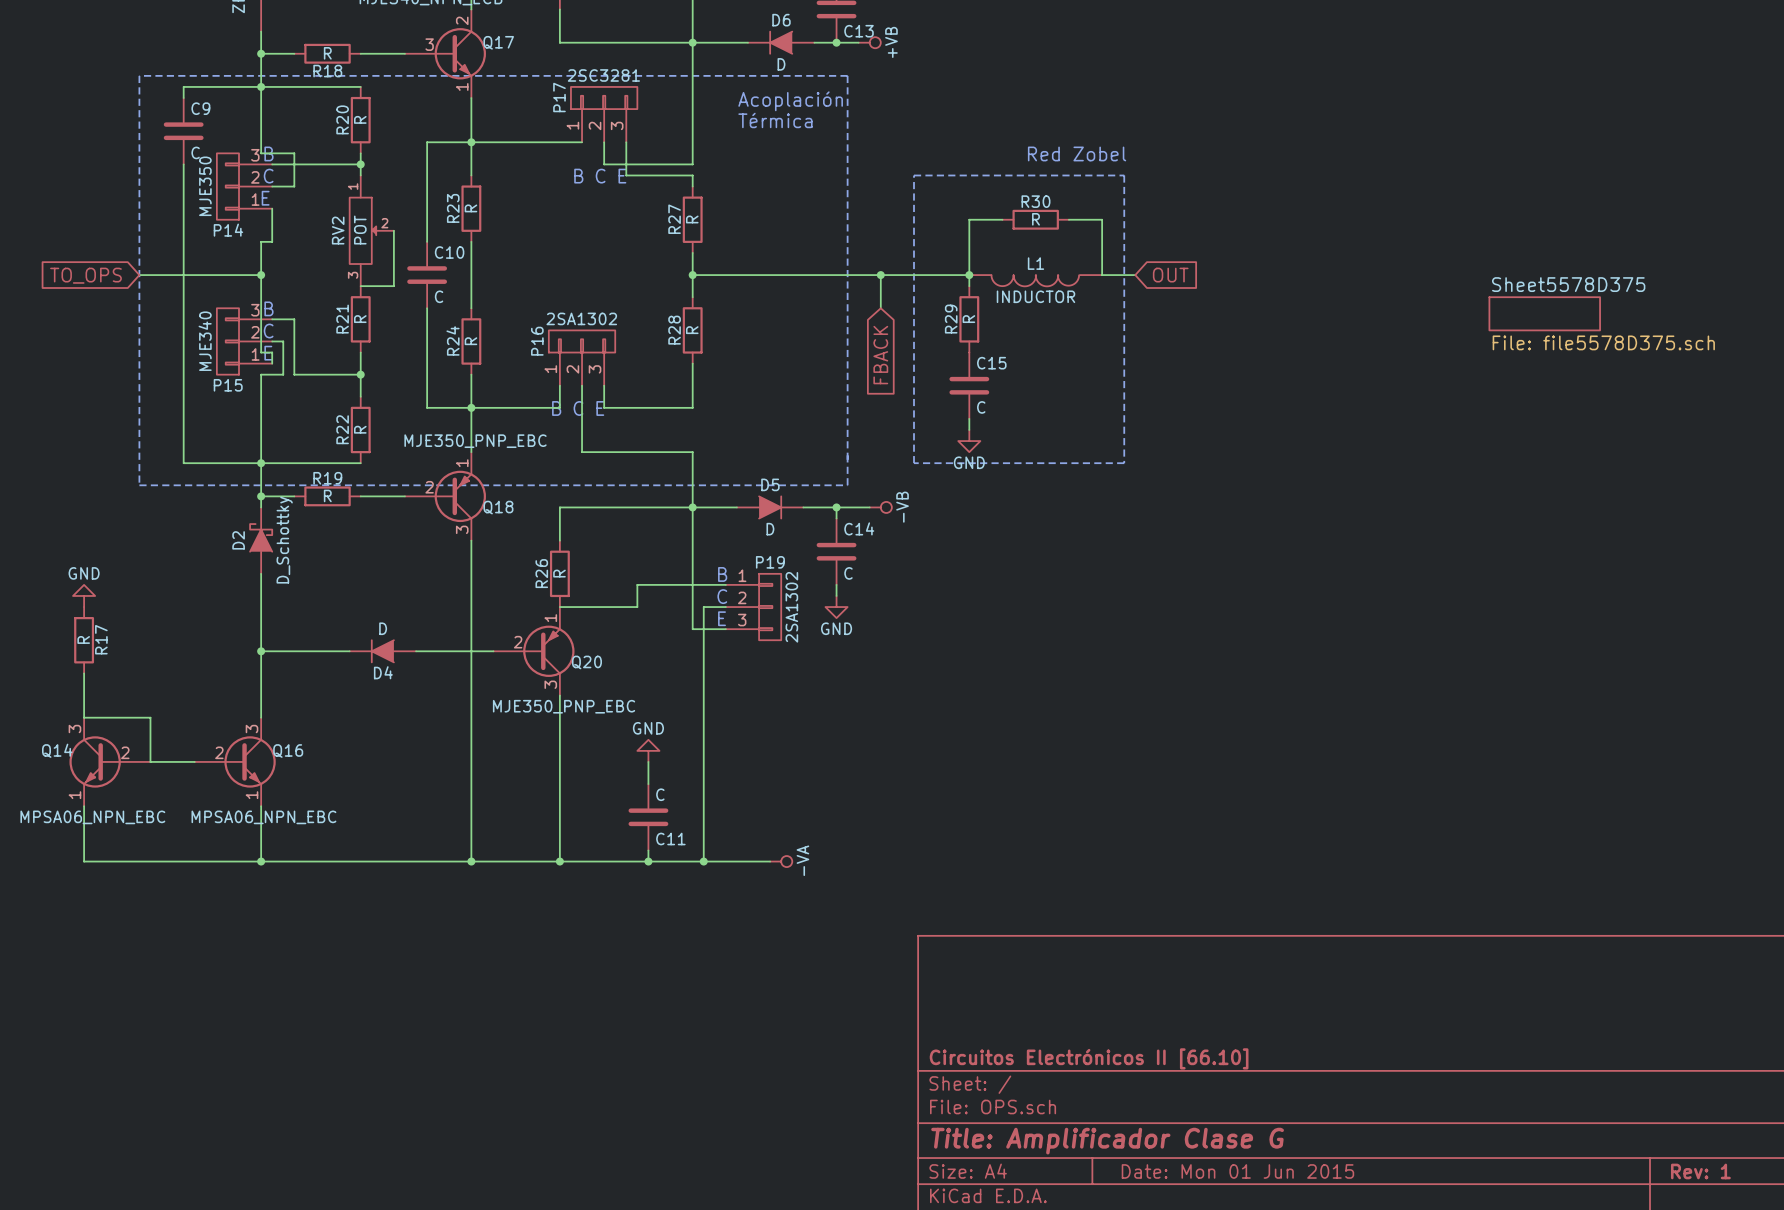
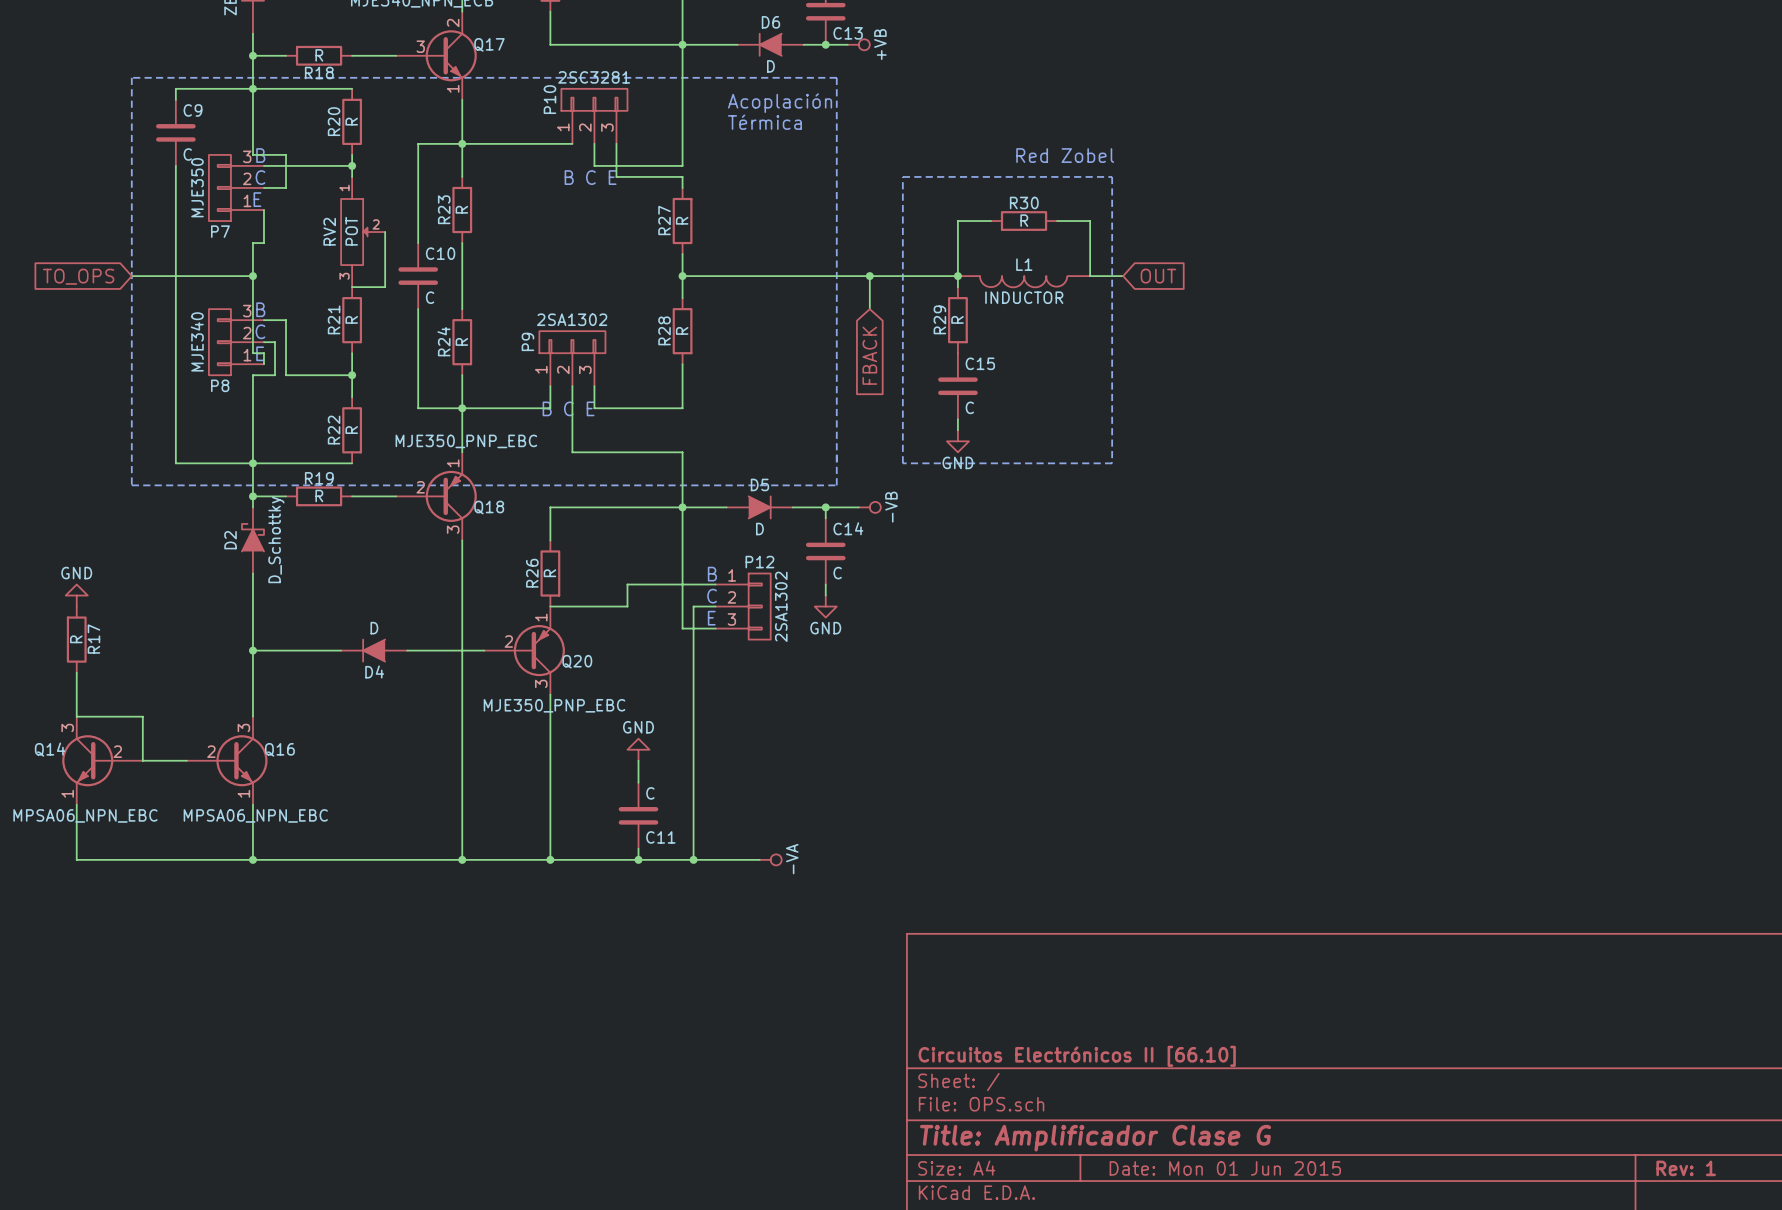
P17 name: P17 (559, 97) -> P10 (549, 99)
P14 name: P14 (228, 230) -> P7 (220, 231)
sheet Sheet5578D375: File: file5578D375.sch (1544, 313) -> none
P16 name: P16 (537, 341) -> P9 (527, 341)
P15 name: P15 (228, 385) -> P8 (220, 385)
P19 name: P19 (770, 562) -> P12 (759, 562)

